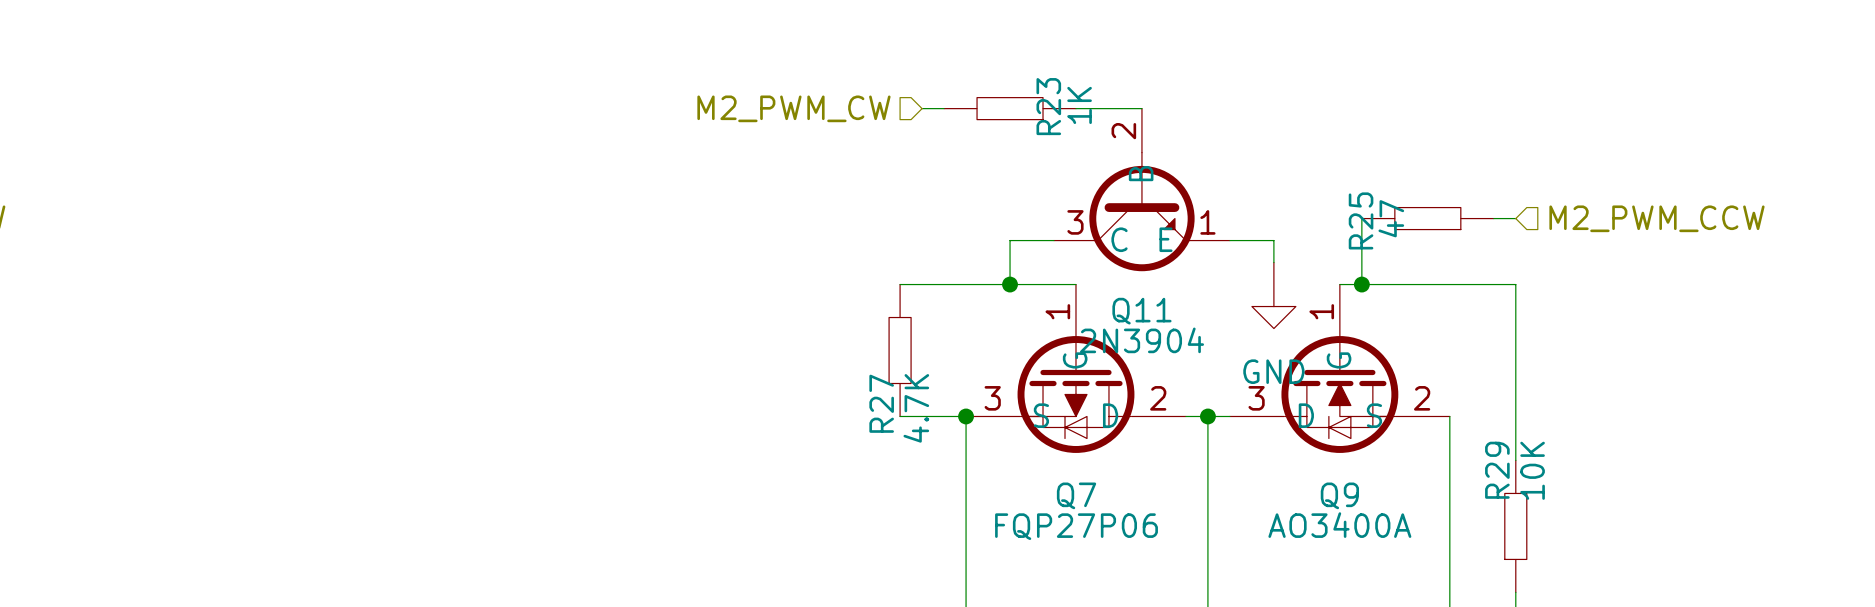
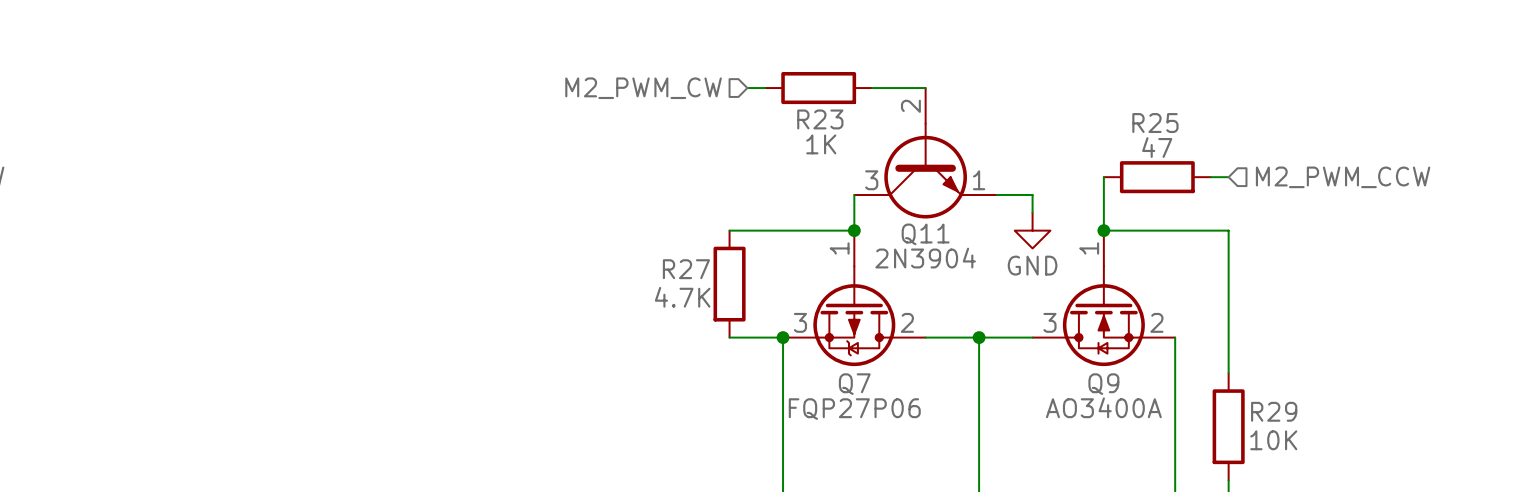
R23 symbol: [944, 97, 1076, 120] -> [765, 72, 873, 105]
R23 value rotation: 0° (1079, 105) -> 90° clockwise (821, 144)
R23 value position: 1K (1079, 105) -> 1K (821, 144)
R23 name rotation: 0° (1048, 106) -> 90° clockwise (820, 119)
Q11 symbol: [1054, 108, 1230, 272] -> [854, 88, 997, 219]
R25 symbol: [1361, 207, 1494, 230] -> [1103, 161, 1211, 194]
R25 value rotation: 0° (1391, 218) -> 90° clockwise (1157, 147)
R25 name rotation: 0° (1361, 220) -> 90° clockwise (1155, 123)
R25 name position: R25 (1361, 220) -> R25 (1155, 123)
wire: (1054, 240) (1010, 240) (1010, 284) -> (854, 194) (854, 230)
power symbol shape: [1251, 262, 1296, 329] -> [1014, 212, 1051, 249]
R27 symbol: [889, 284, 912, 417] -> [713, 230, 746, 338]
Q7 symbol: [966, 284, 1186, 453] -> [783, 230, 926, 367]
junction position: (1010, 284) -> (854, 230)
wire: (1054, 284) (1075, 284) -> none
Q9 symbol: [1229, 284, 1450, 453] -> [1032, 230, 1176, 367]
wire: (1339, 284) (1361, 284) -> none
R27 name rotation: 0° (881, 403) -> 90° clockwise (686, 269)
R27 value rotation: 0° (916, 408) -> 90° clockwise (682, 297)
R29 symbol: [1504, 460, 1527, 593] -> [1212, 373, 1245, 481]
R29 name rotation: 0° (1497, 470) -> 90° clockwise (1274, 411)
R29 name position: R29 (1497, 470) -> R29 (1274, 411)
R29 value rotation: 0° (1532, 470) -> 90° clockwise (1273, 440)
R29 value position: 10K (1532, 470) -> 10K (1273, 440)

